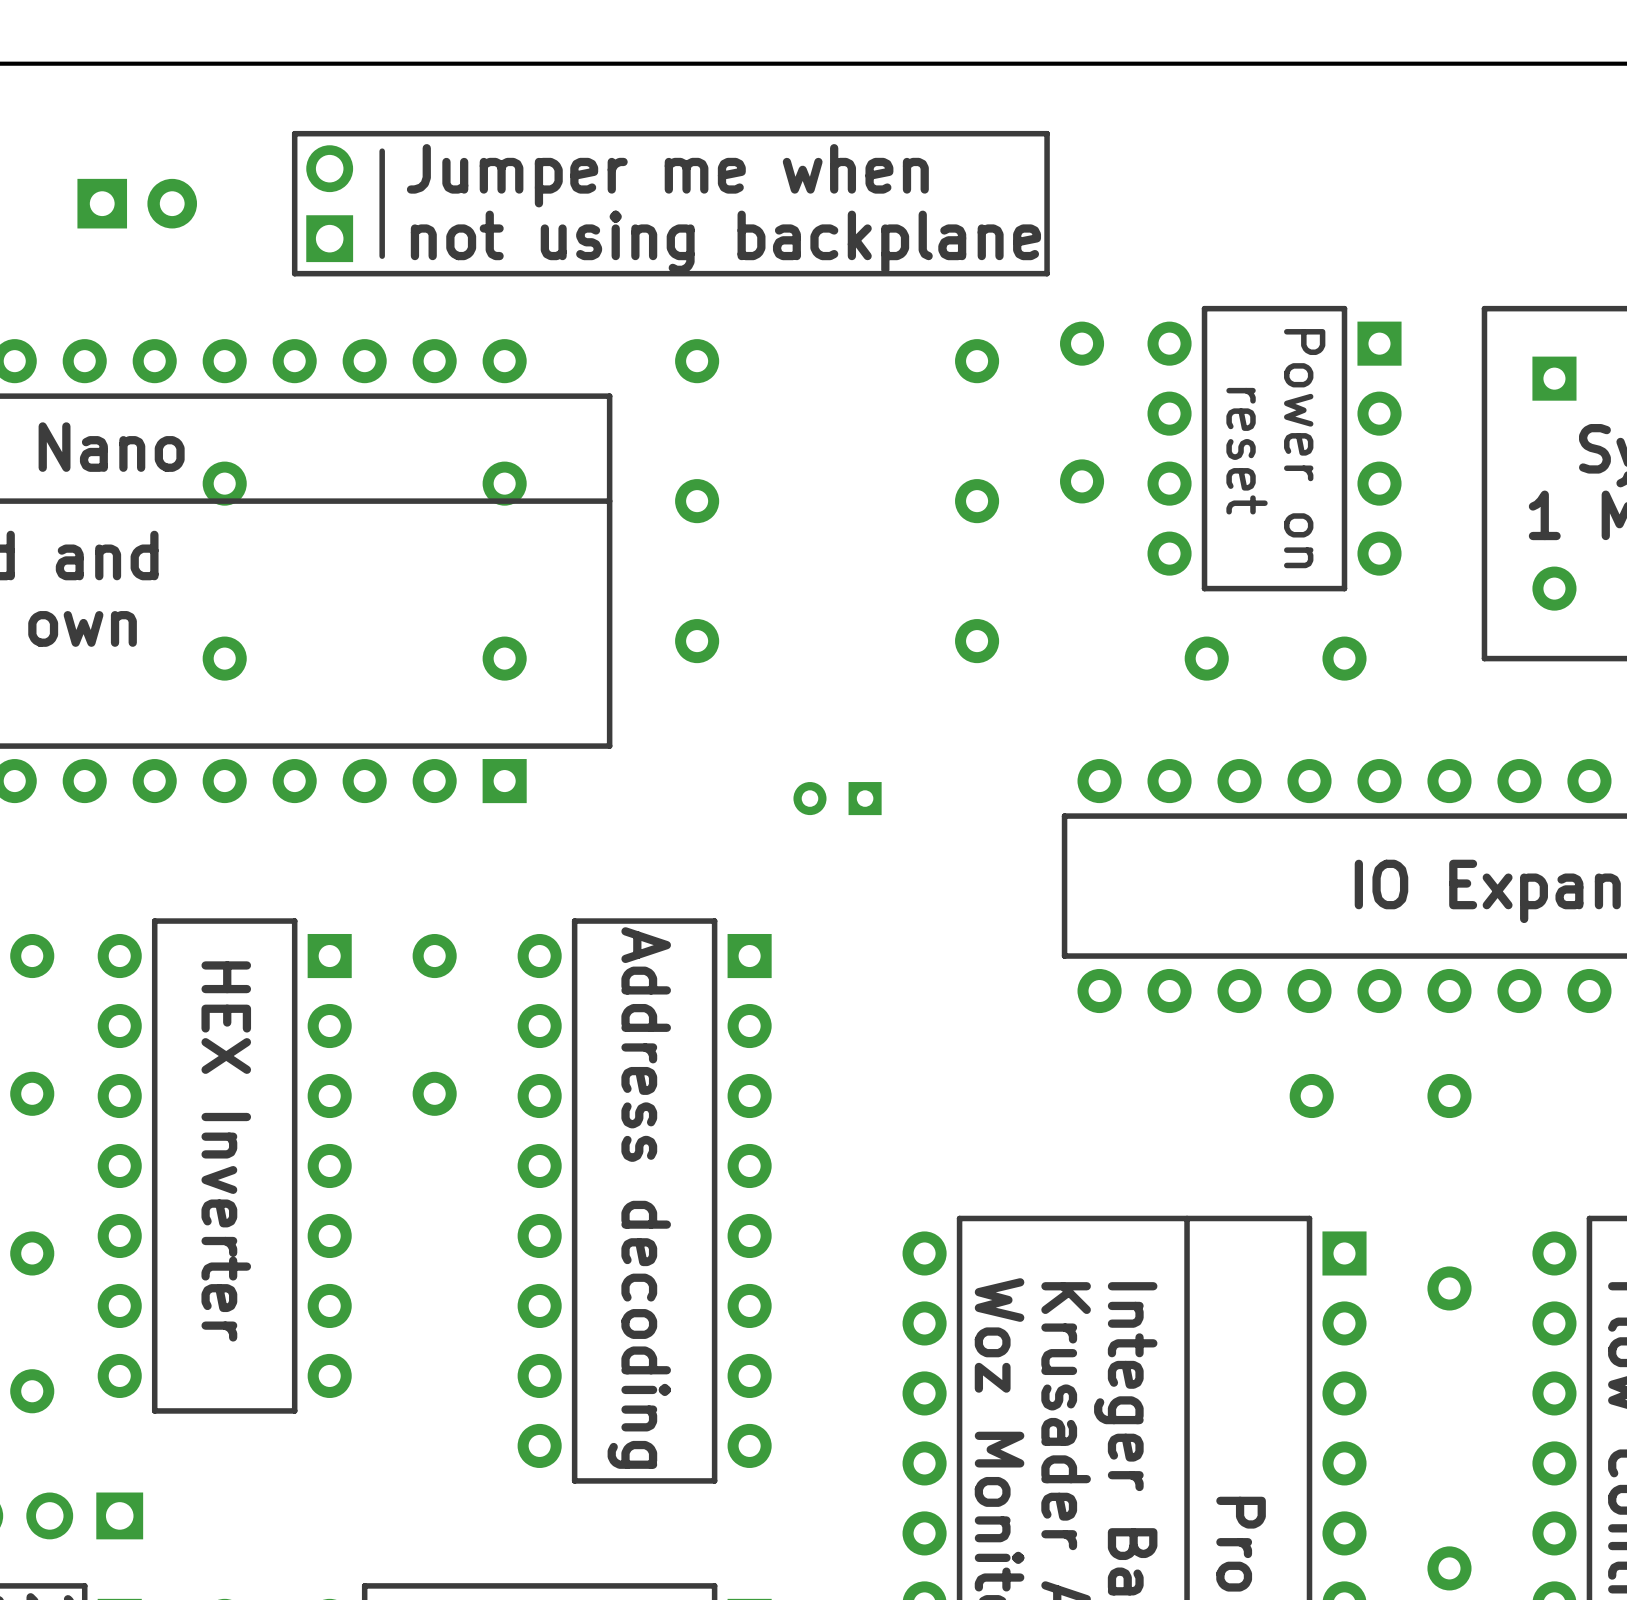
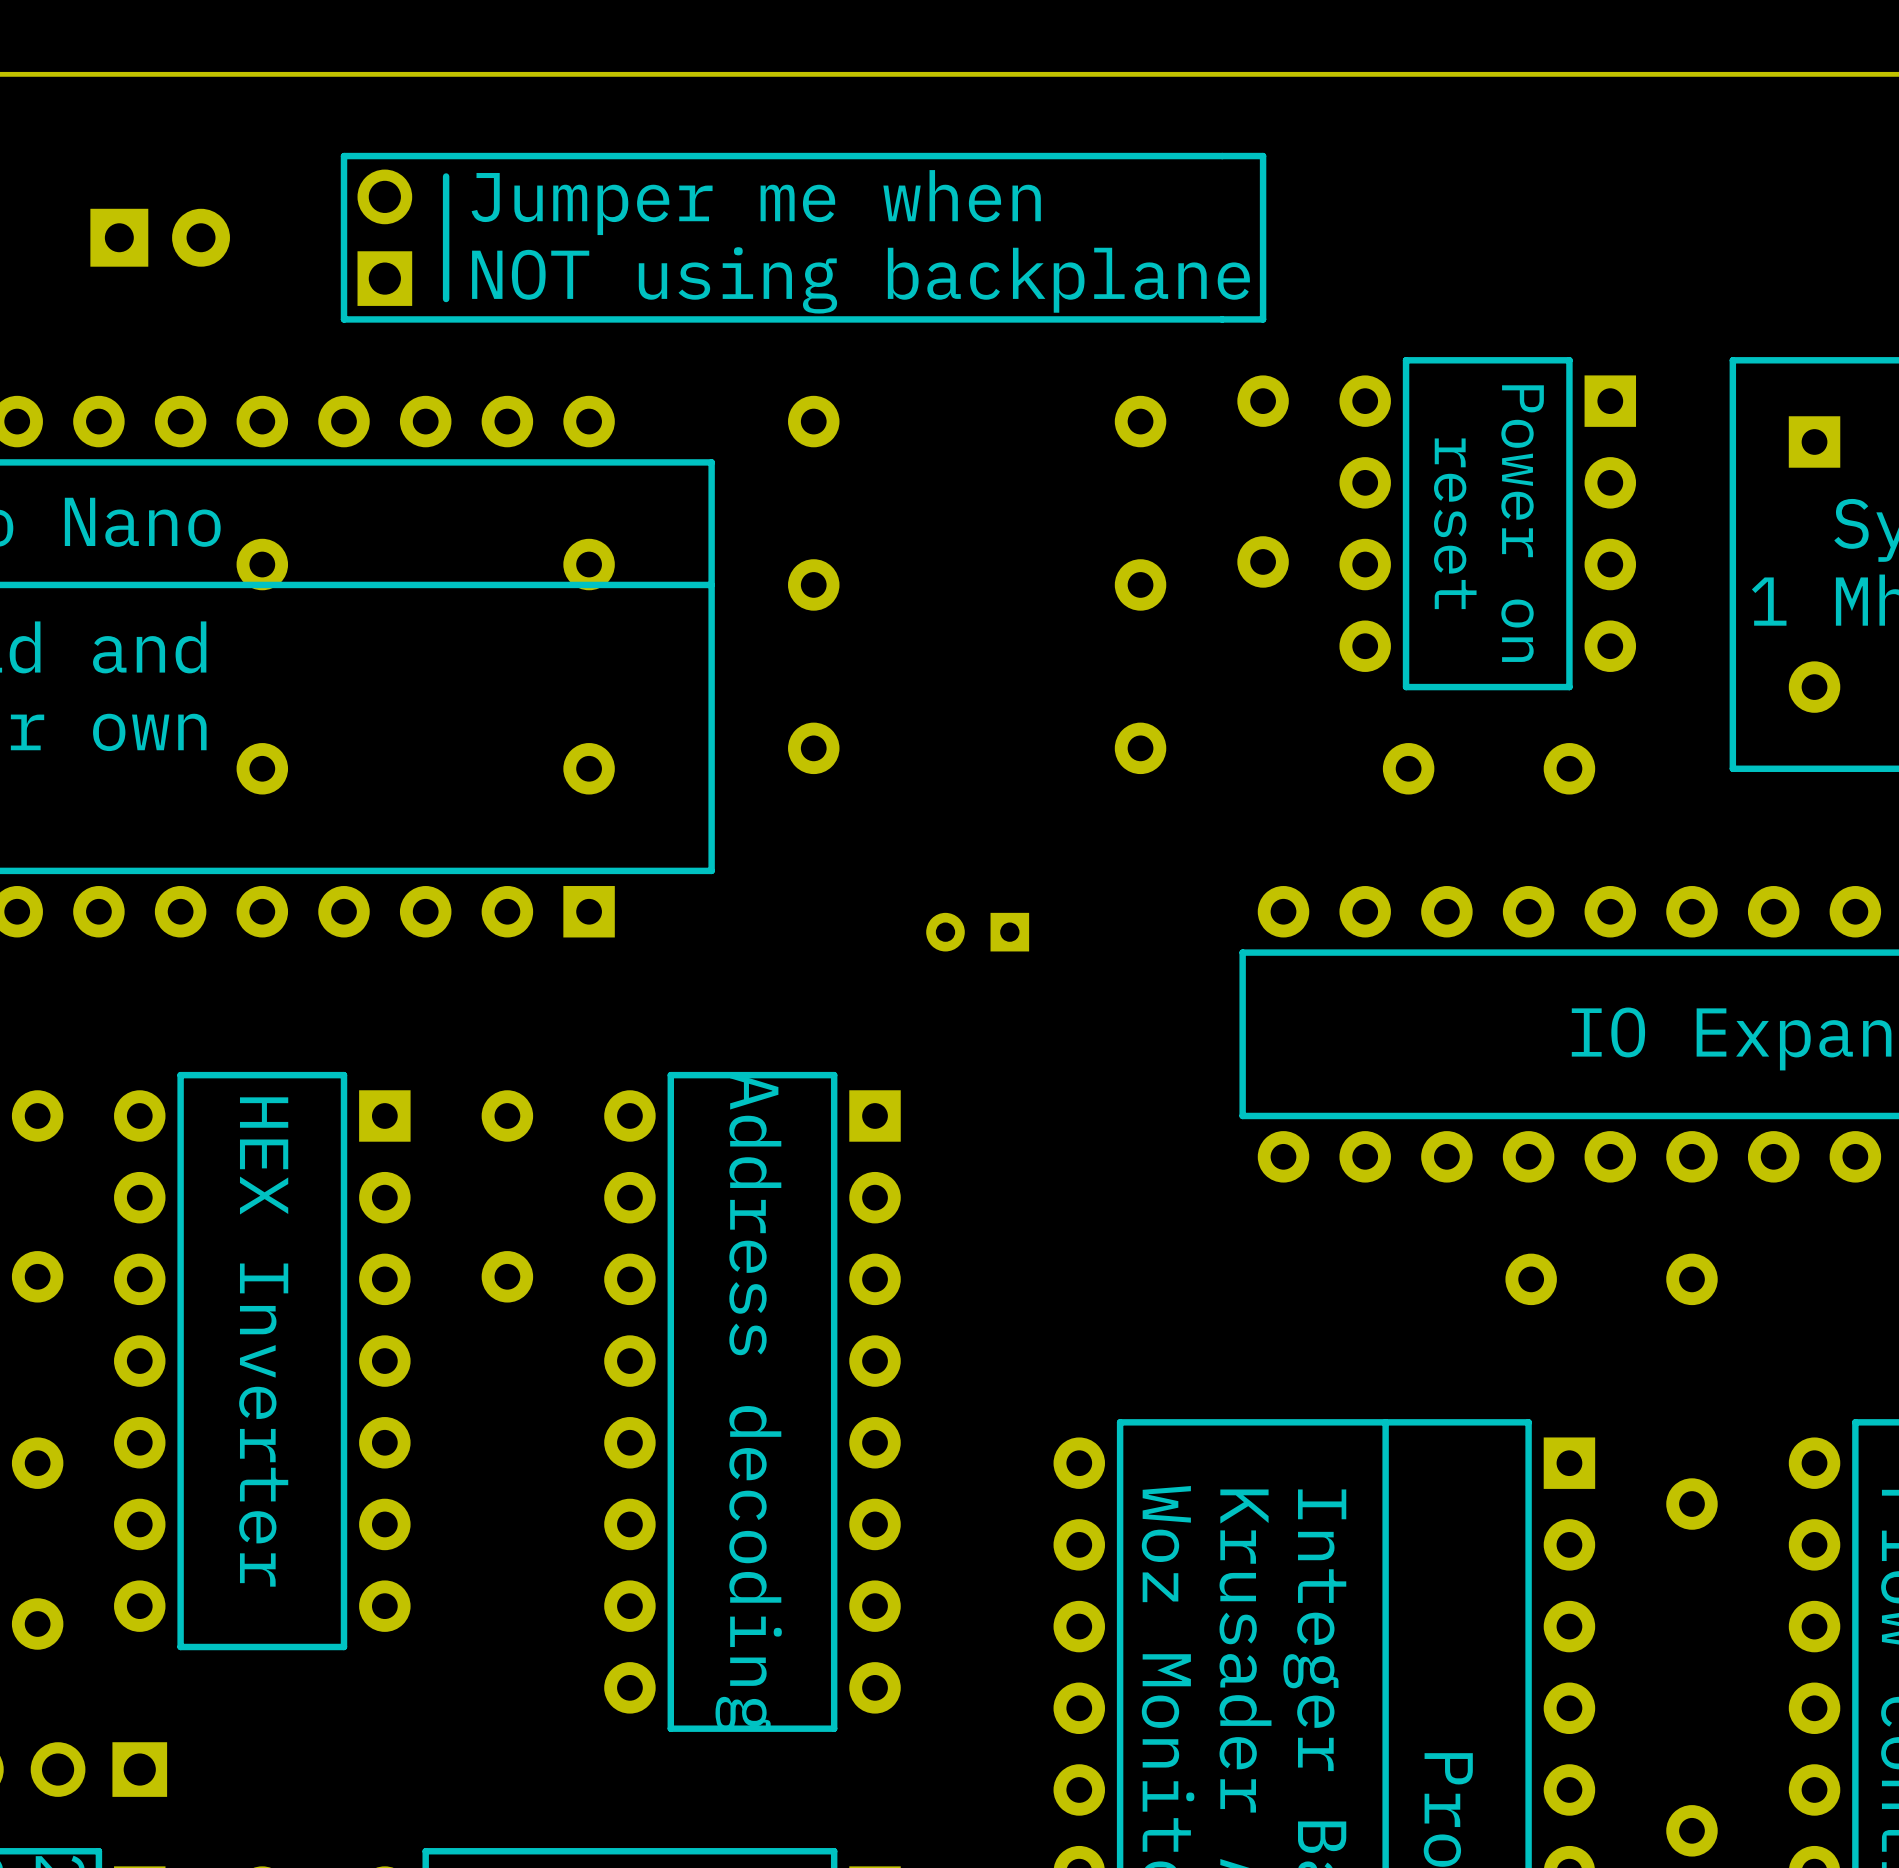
line: (1047, 133) (1047, 273) -> (1222, 156) (1263, 156) (1263, 319) (1222, 319)
text: not using backplane (725, 242) -> NOT using backplane (860, 280)

